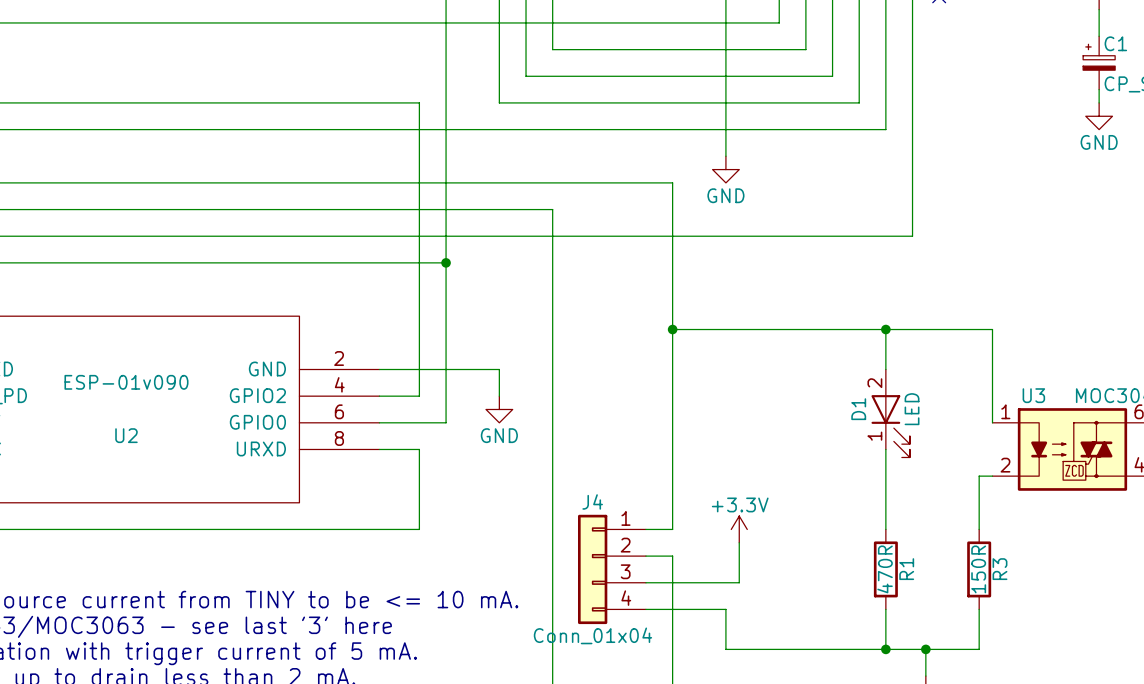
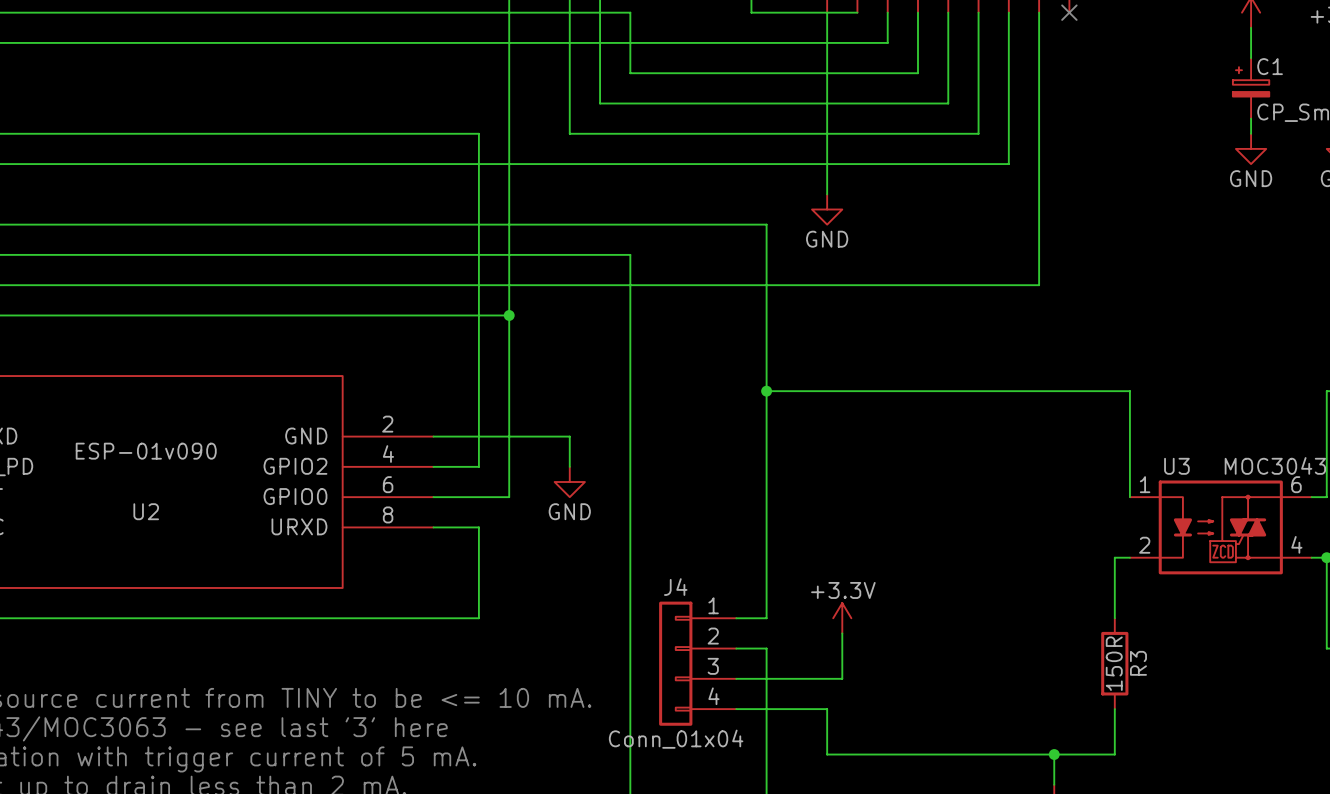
wire: (885, 329) (885, 369) -> none
junction: (885, 329) -> none
D1: LED (890, 413) -> none
wire: (885, 449) (885, 529) -> none
R1: 470R (885, 569) -> none
wire: (885, 609) (885, 649) -> none
junction: (885, 649) -> none

